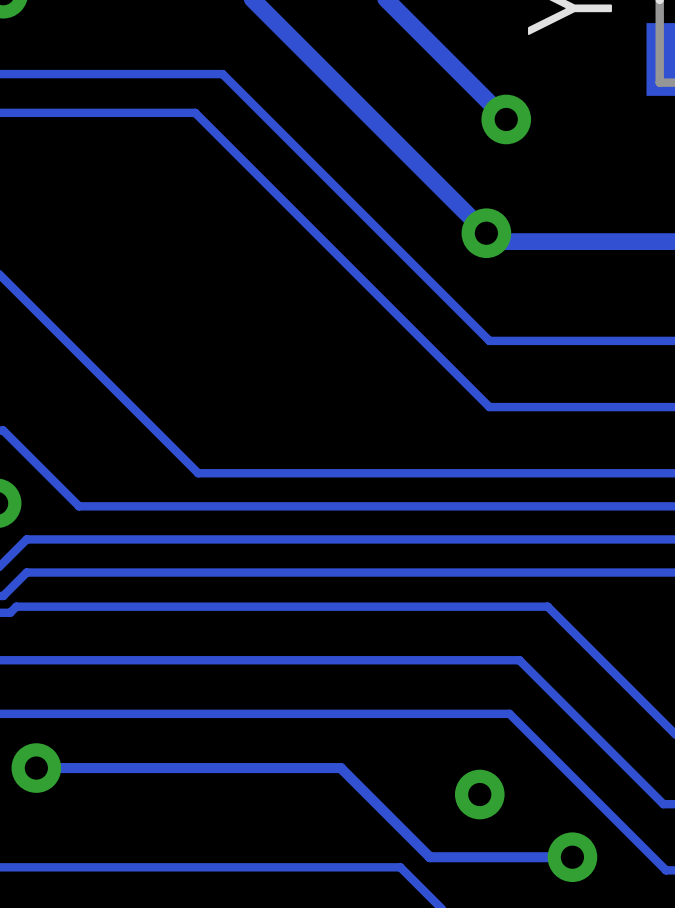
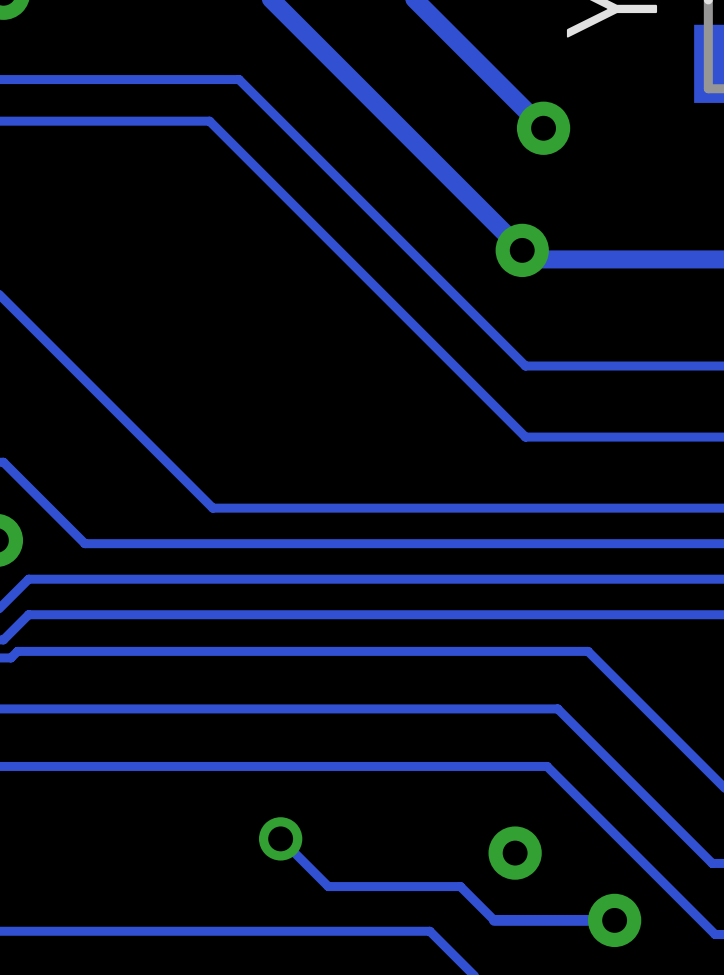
track: (36, 768) (340, 768) (429, 857) (460, 857) -> (280, 838) (328, 886) (460, 886) (494, 920)
via: (36, 768) -> none
via: none -> (280, 838)

